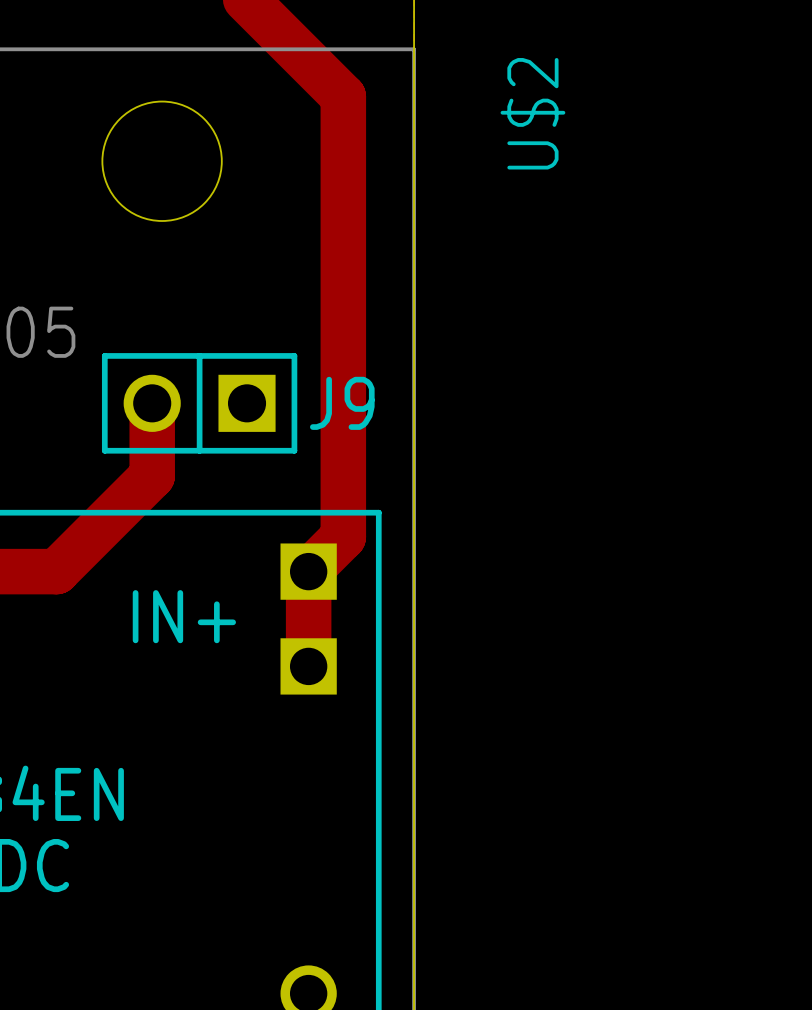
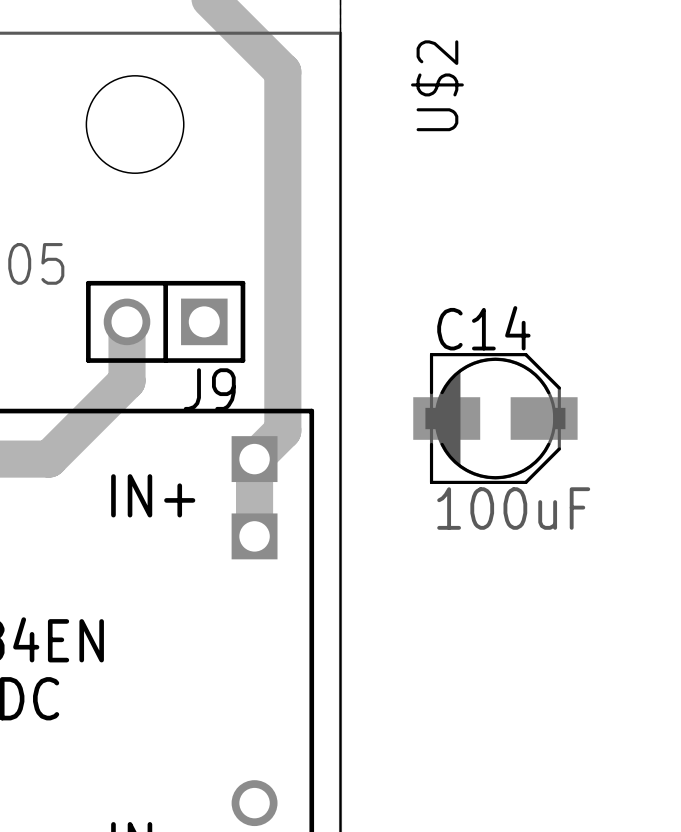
J9 name position: J9 (342, 403) -> J9 (209, 389)
C14: none -> 100uF (495, 418)

